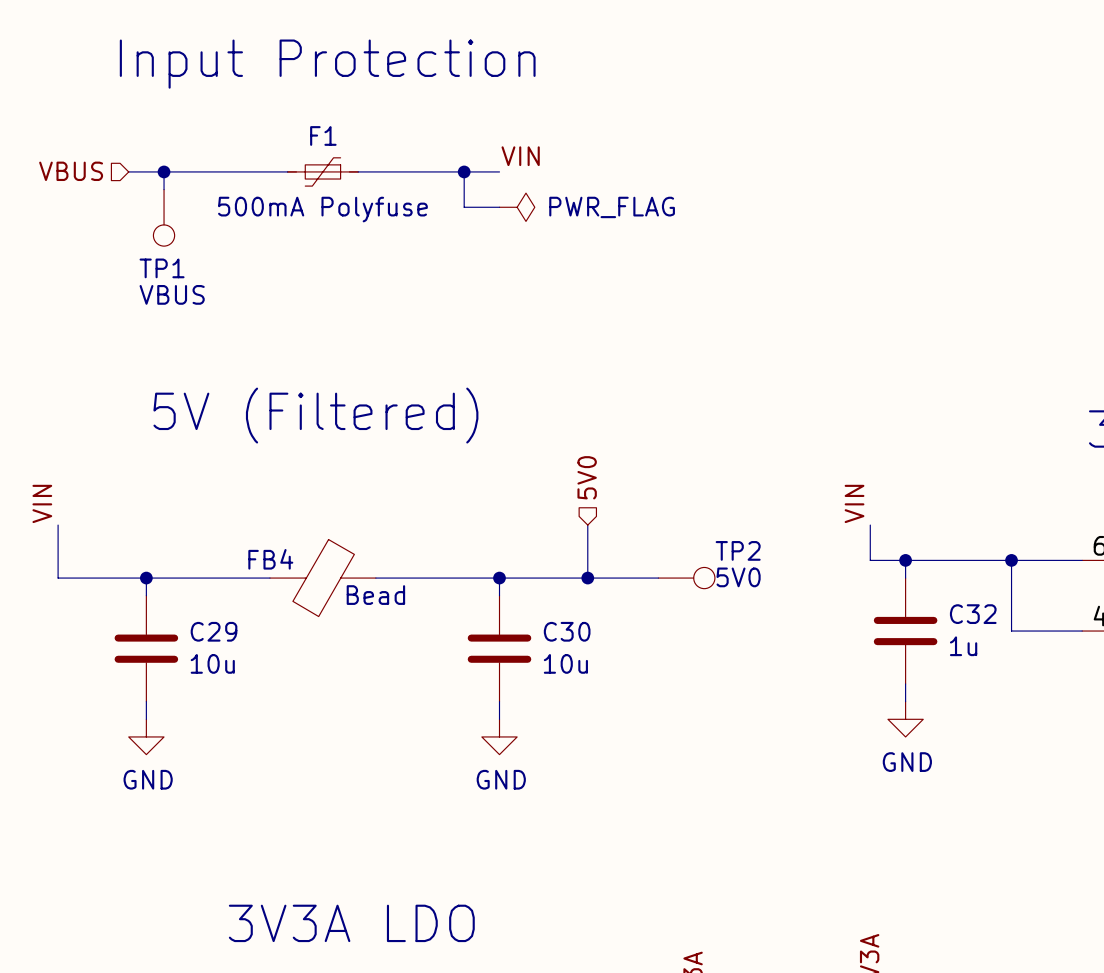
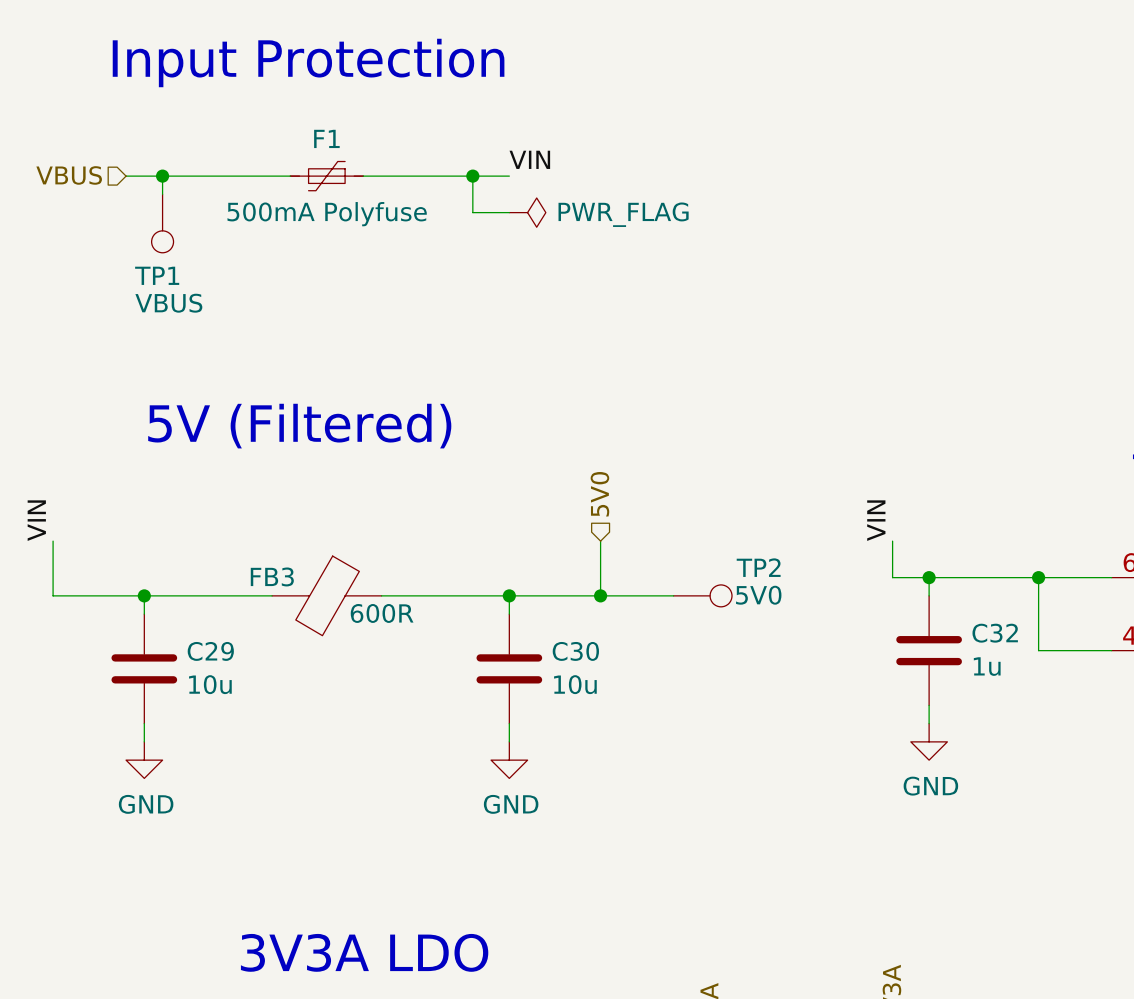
FB4 name: FB4 (270, 559) -> FB3 (272, 576)
FB4 value: Bead (375, 595) -> 600R (382, 613)

